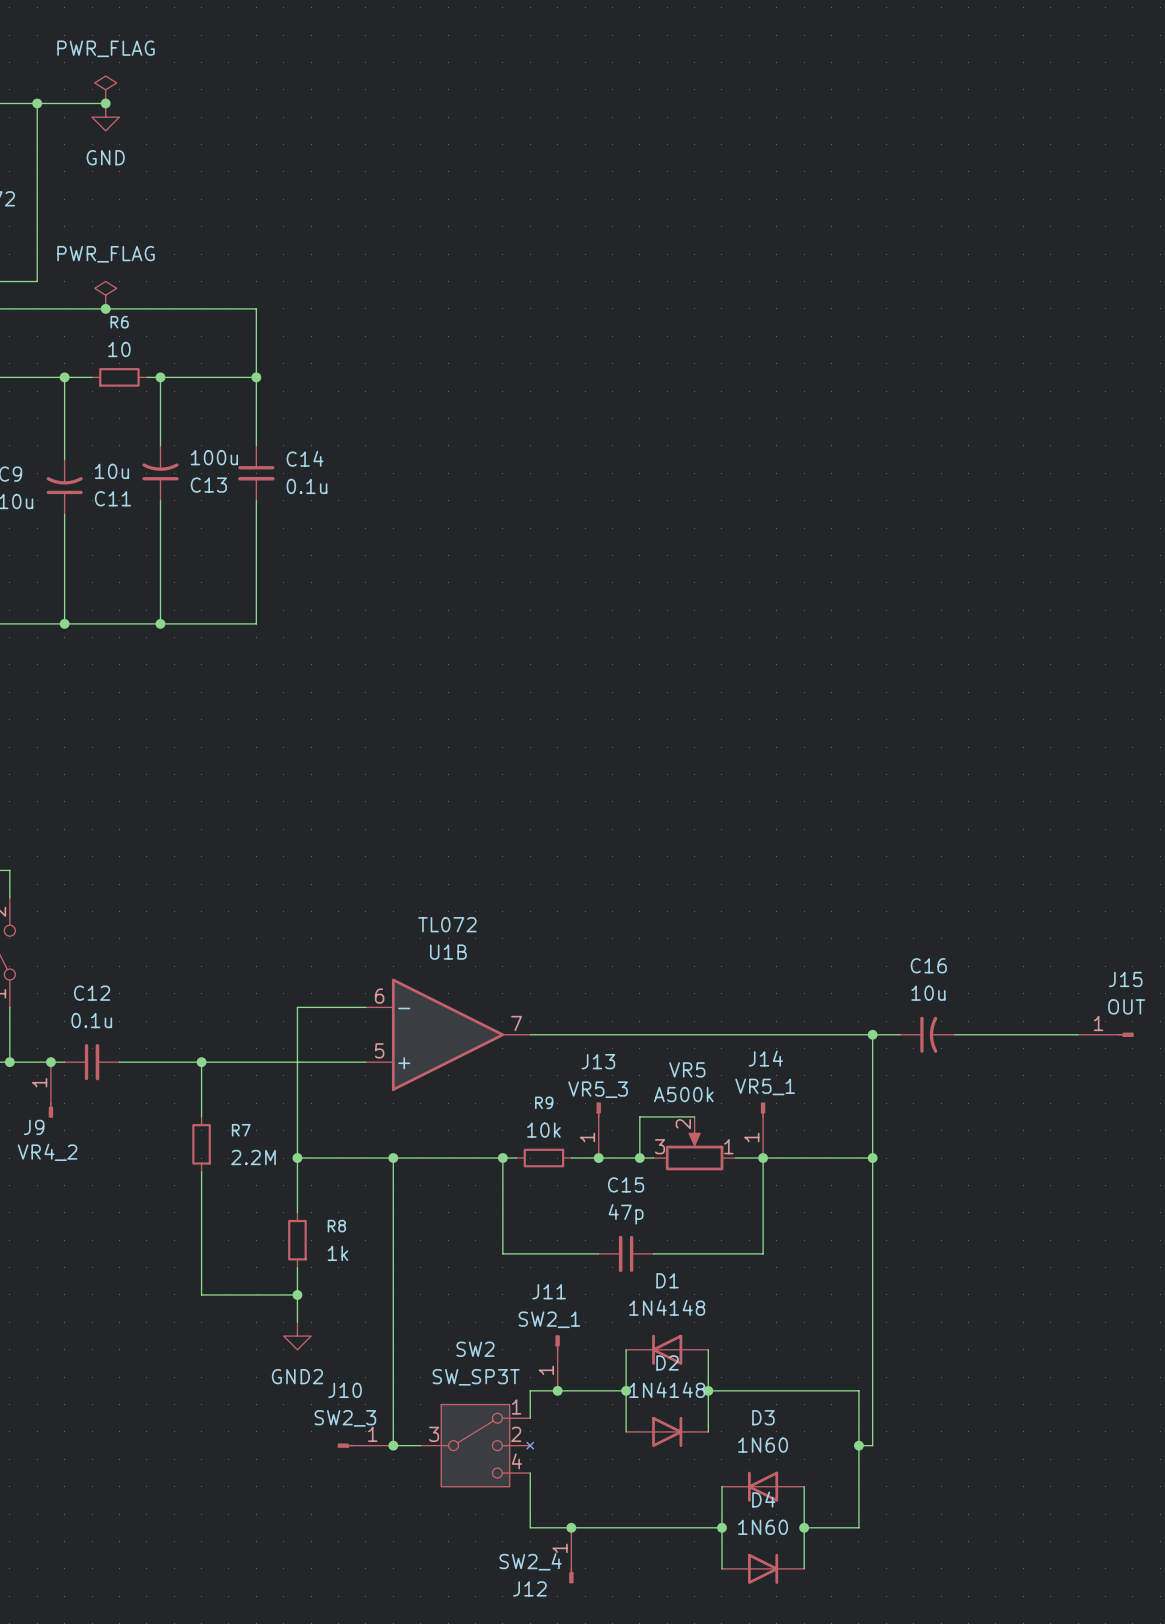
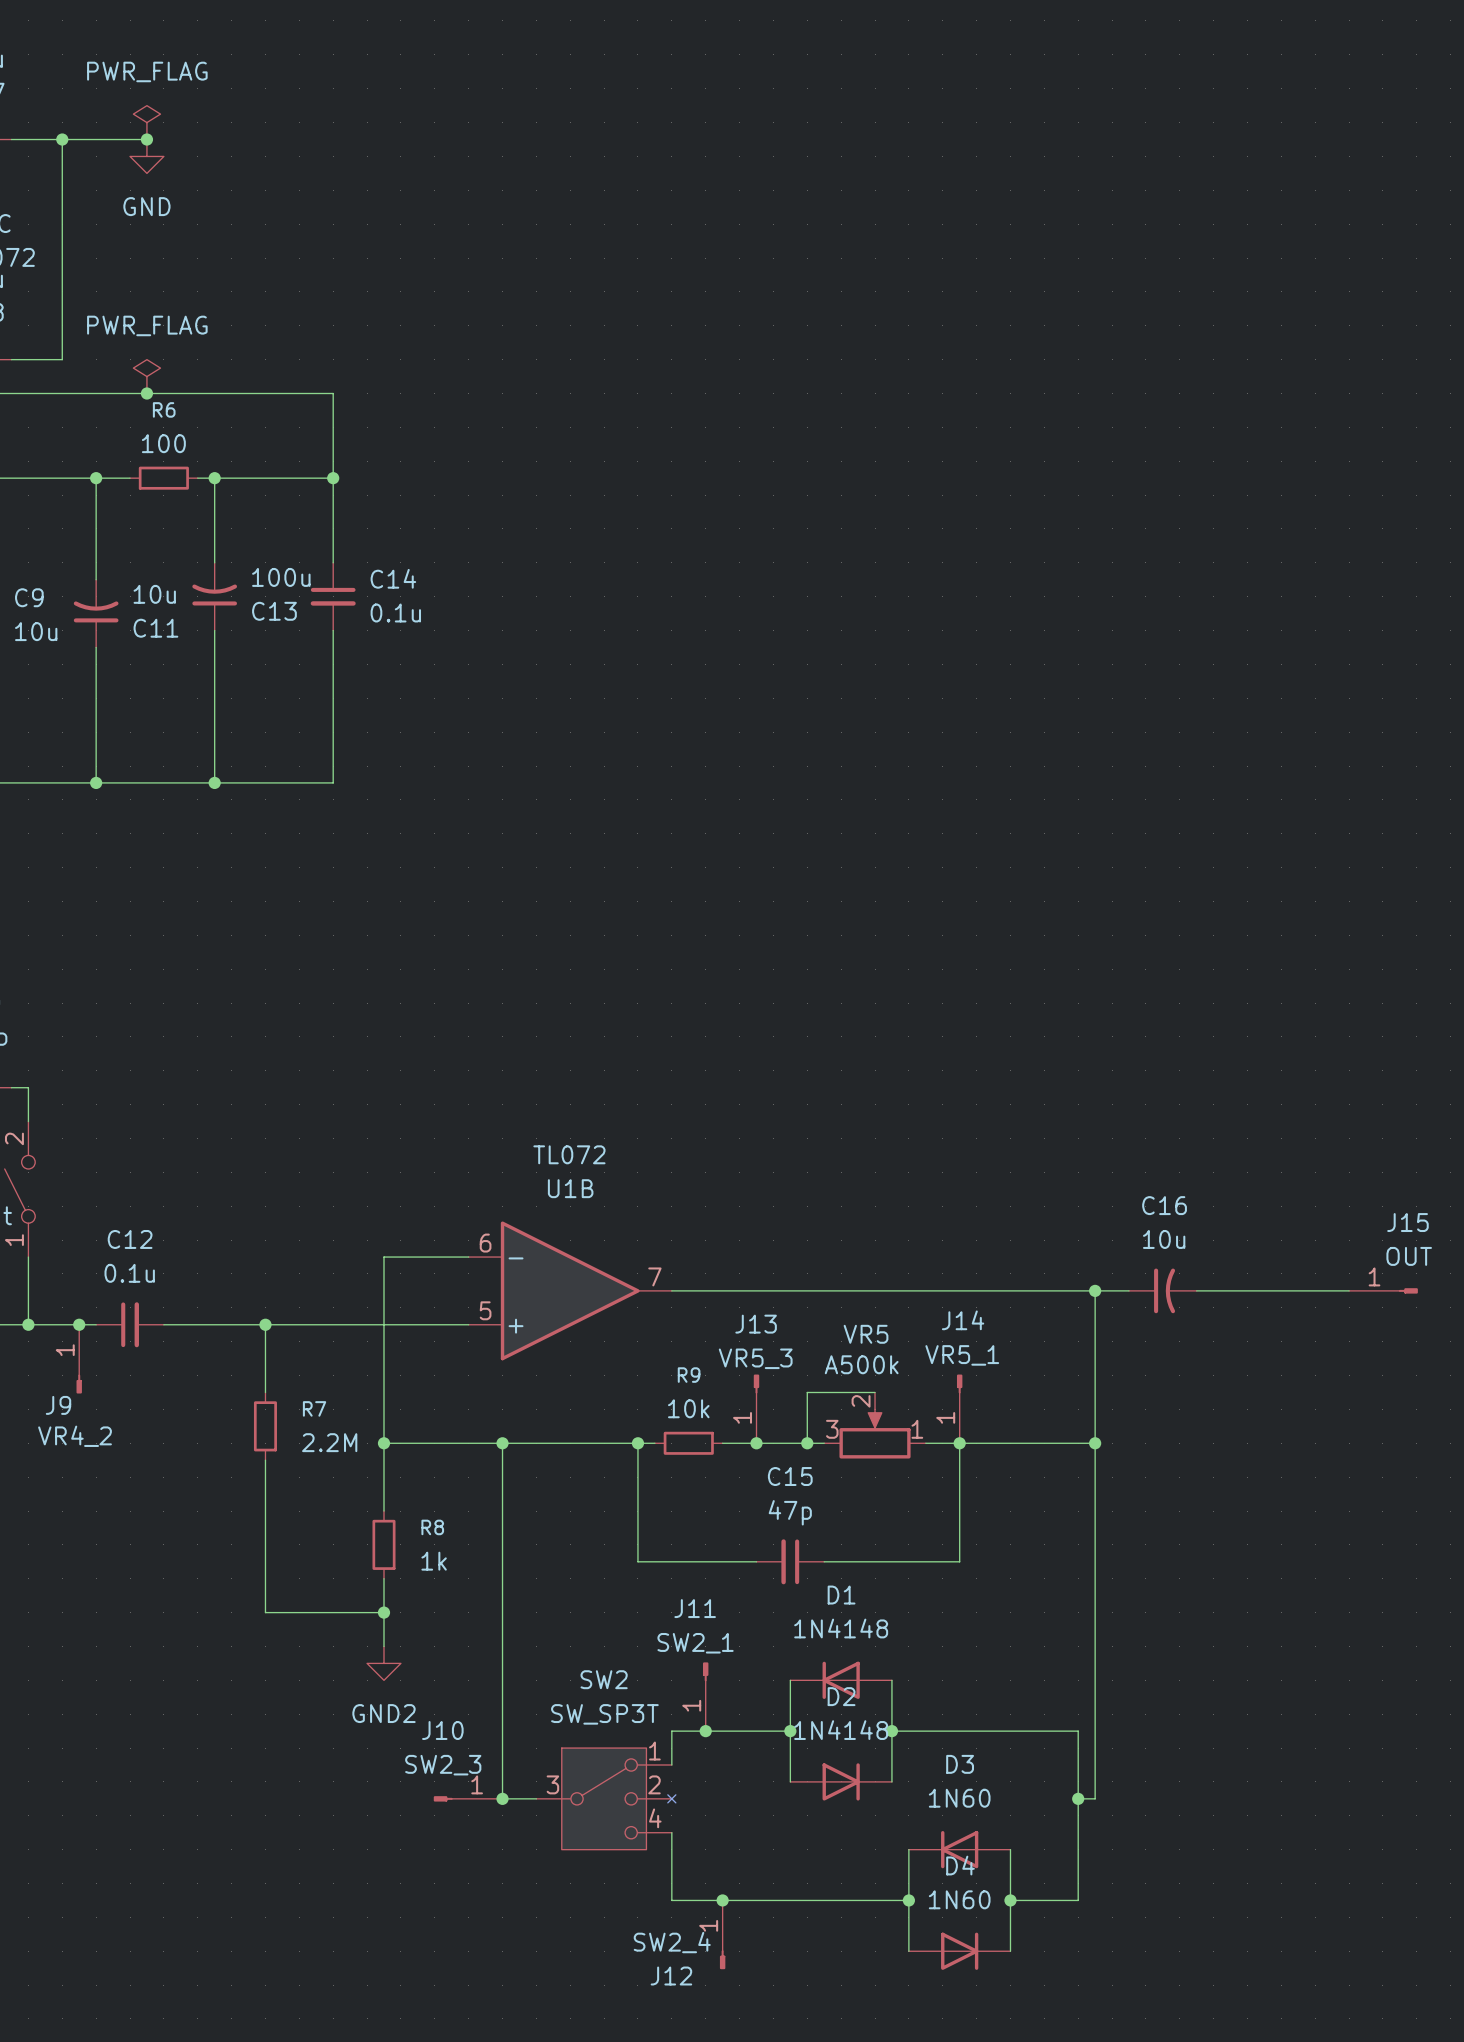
R6 value: 10 (119, 349) -> 100 (163, 443)

